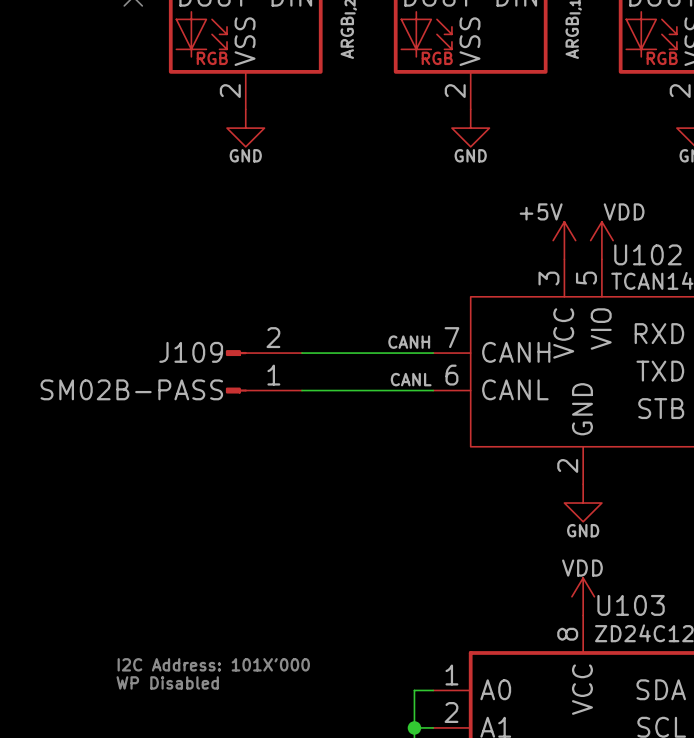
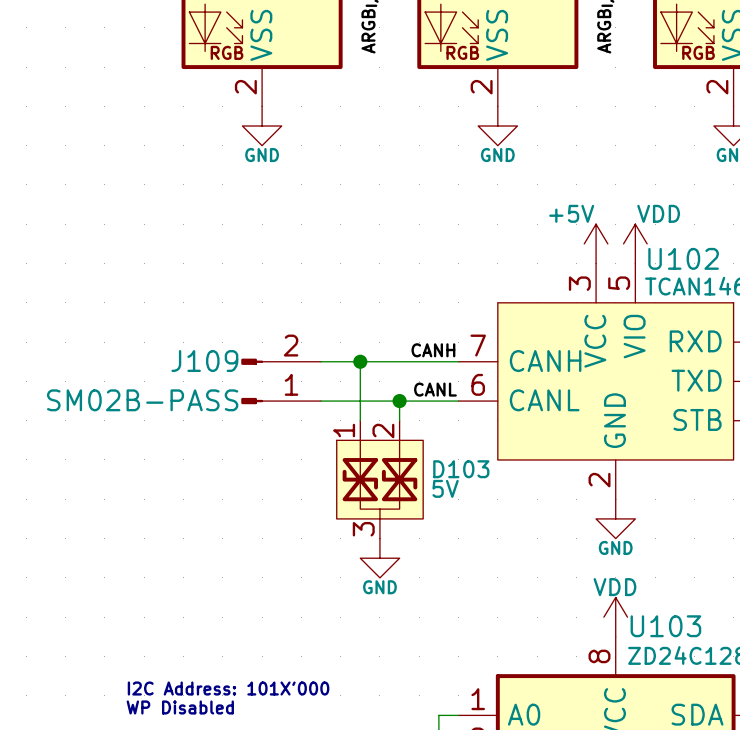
wire: none -> (360, 361) (360, 420)
junction: none -> (360, 361)
wire: none -> (399, 401) (399, 420)
junction: none -> (399, 401)
D103: none -> 5V (379, 479)
power symbol: none -> GND (379, 558)

